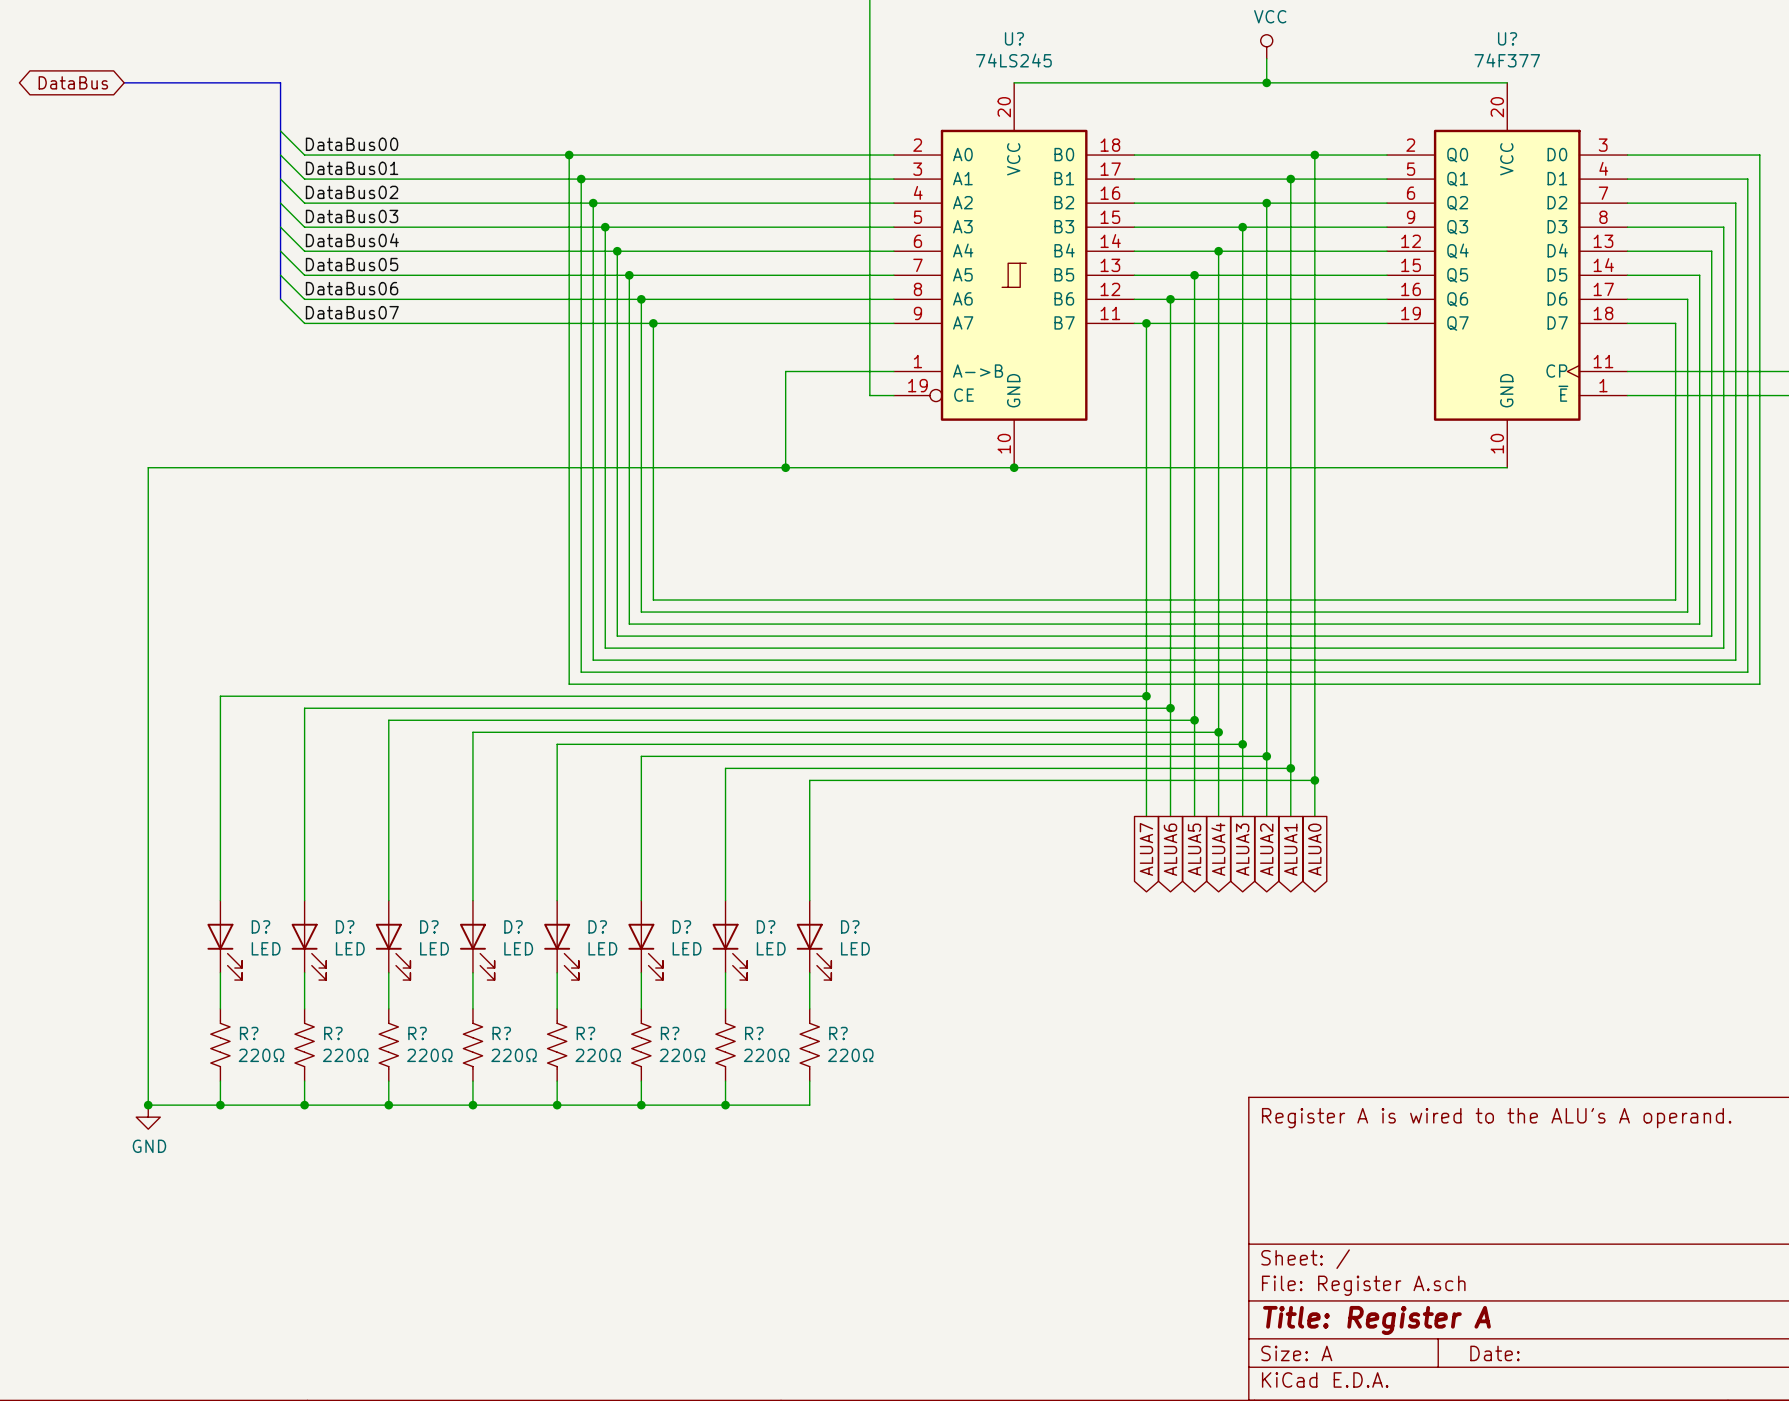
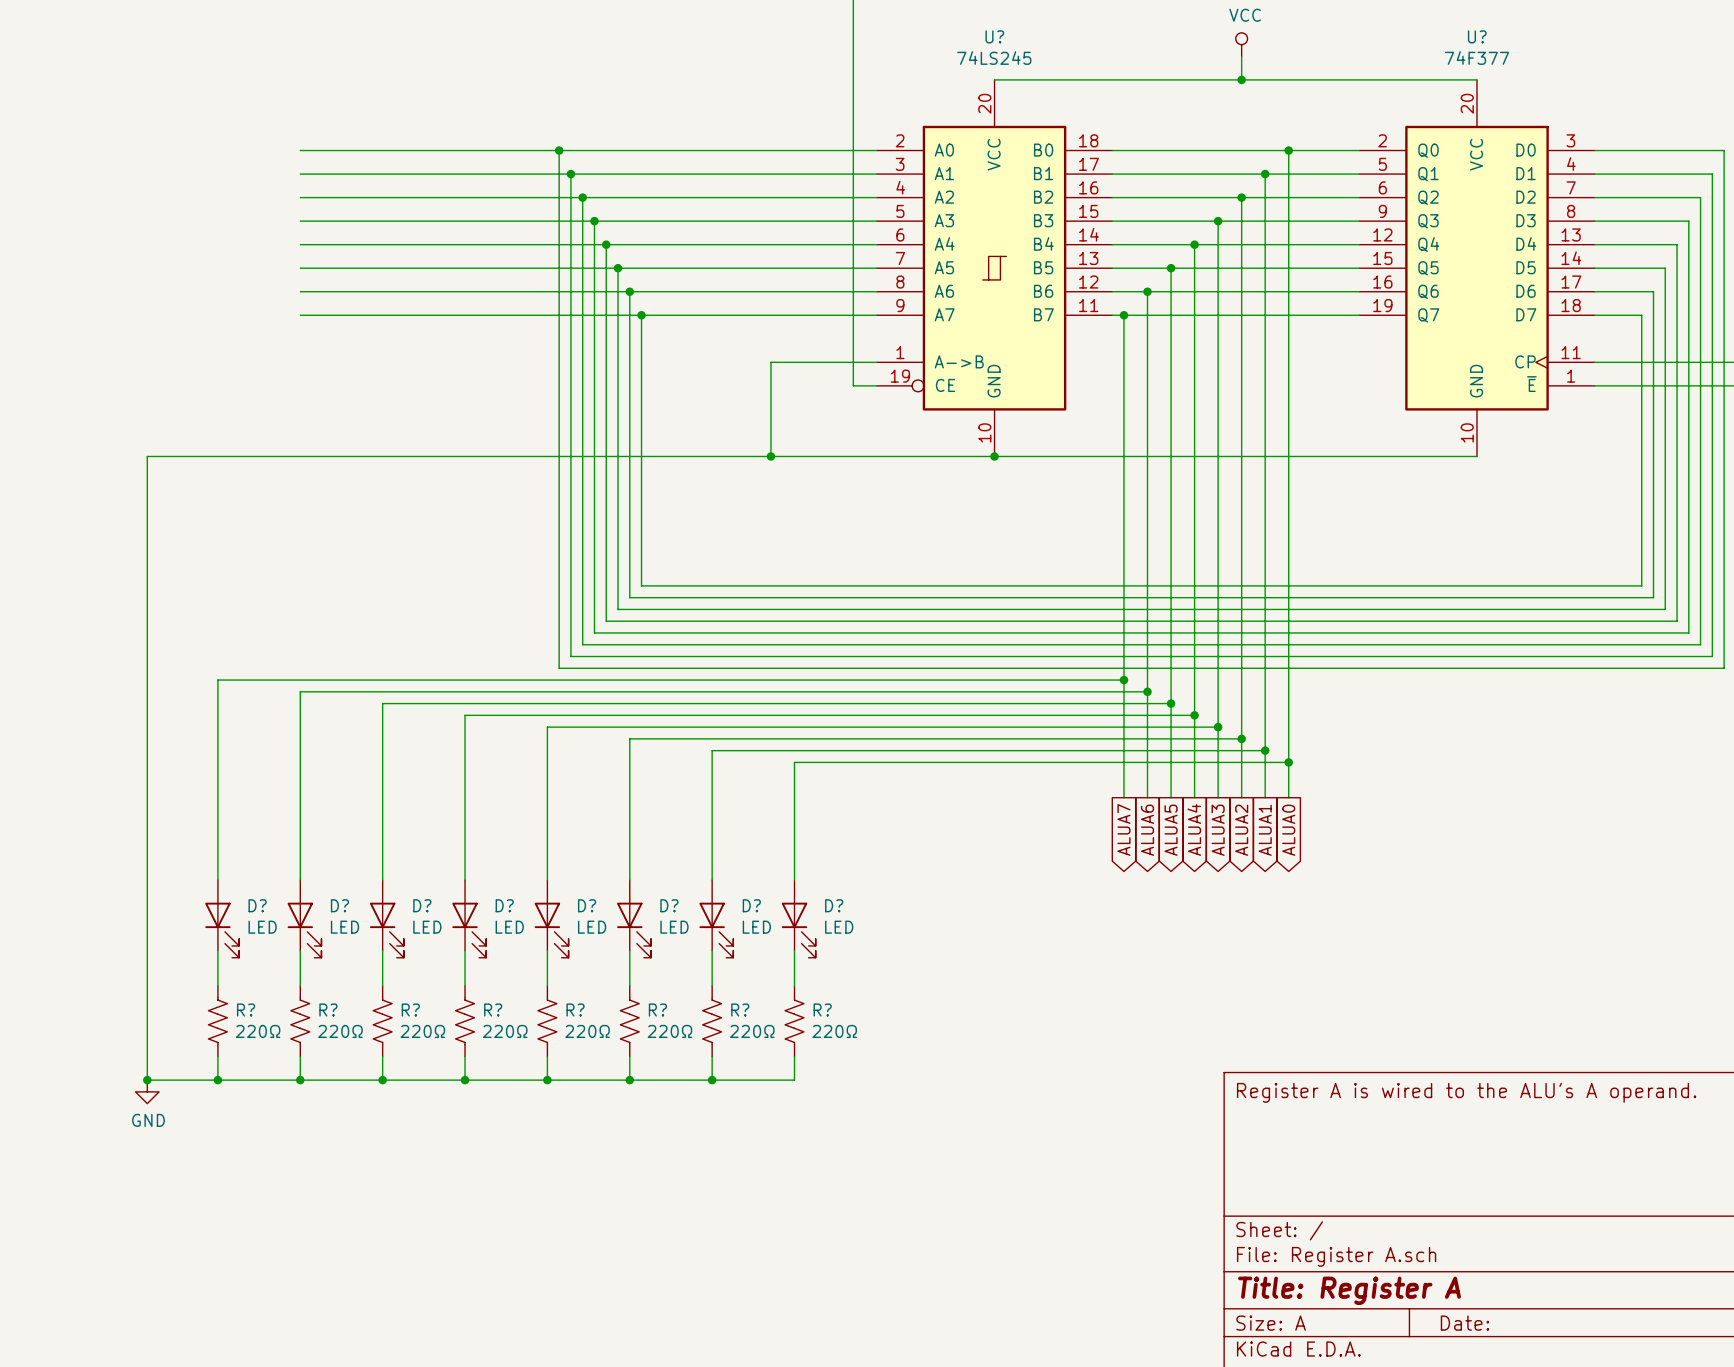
global label: DataBus (73, 82) -> none
bus: (124, 82) (280, 82) (280, 299) -> none
wire: (280, 130) (304, 155) -> none
label: DataBus00 (352, 144) -> none
wire: (280, 155) (304, 179) -> none
label: DataBus01 (352, 168) -> none
wire: (280, 179) (304, 203) -> none
label: DataBus02 (352, 192) -> none
wire: (280, 203) (304, 227) -> none
label: DataBus03 (352, 216) -> none
wire: (280, 227) (304, 251) -> none
label: DataBus04 (352, 240) -> none
wire: (280, 251) (304, 275) -> none
label: DataBus05 (352, 264) -> none
wire: (280, 275) (304, 299) -> none
label: DataBus06 (352, 288) -> none
wire: (280, 299) (304, 323) -> none
label: DataBus07 (352, 312) -> none

